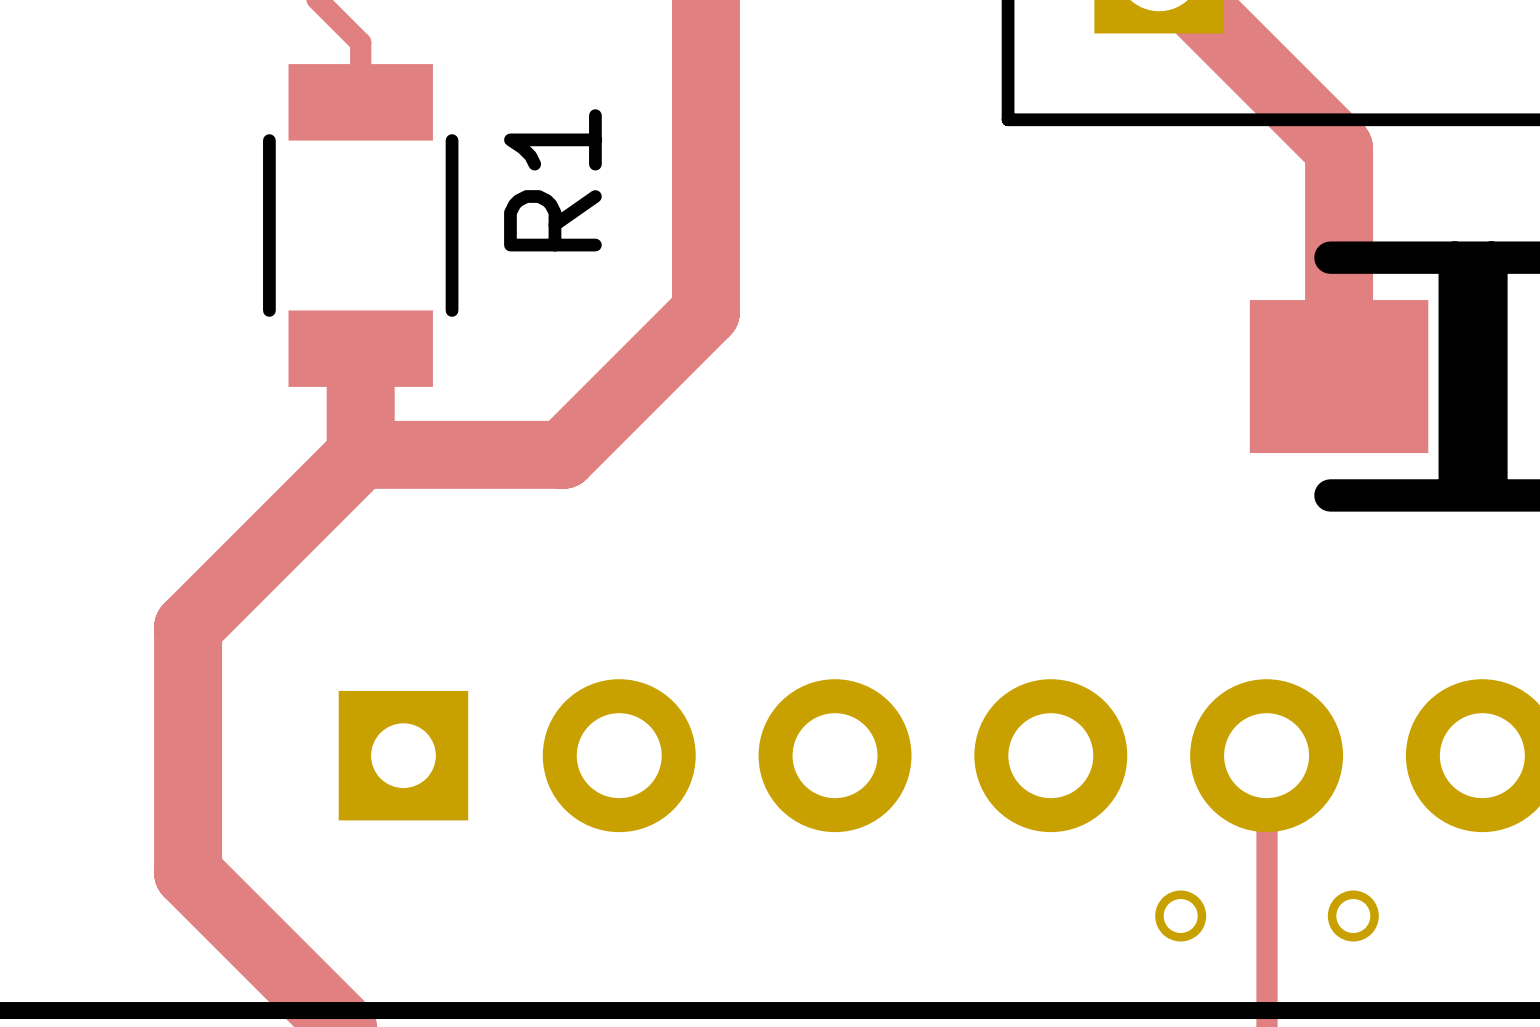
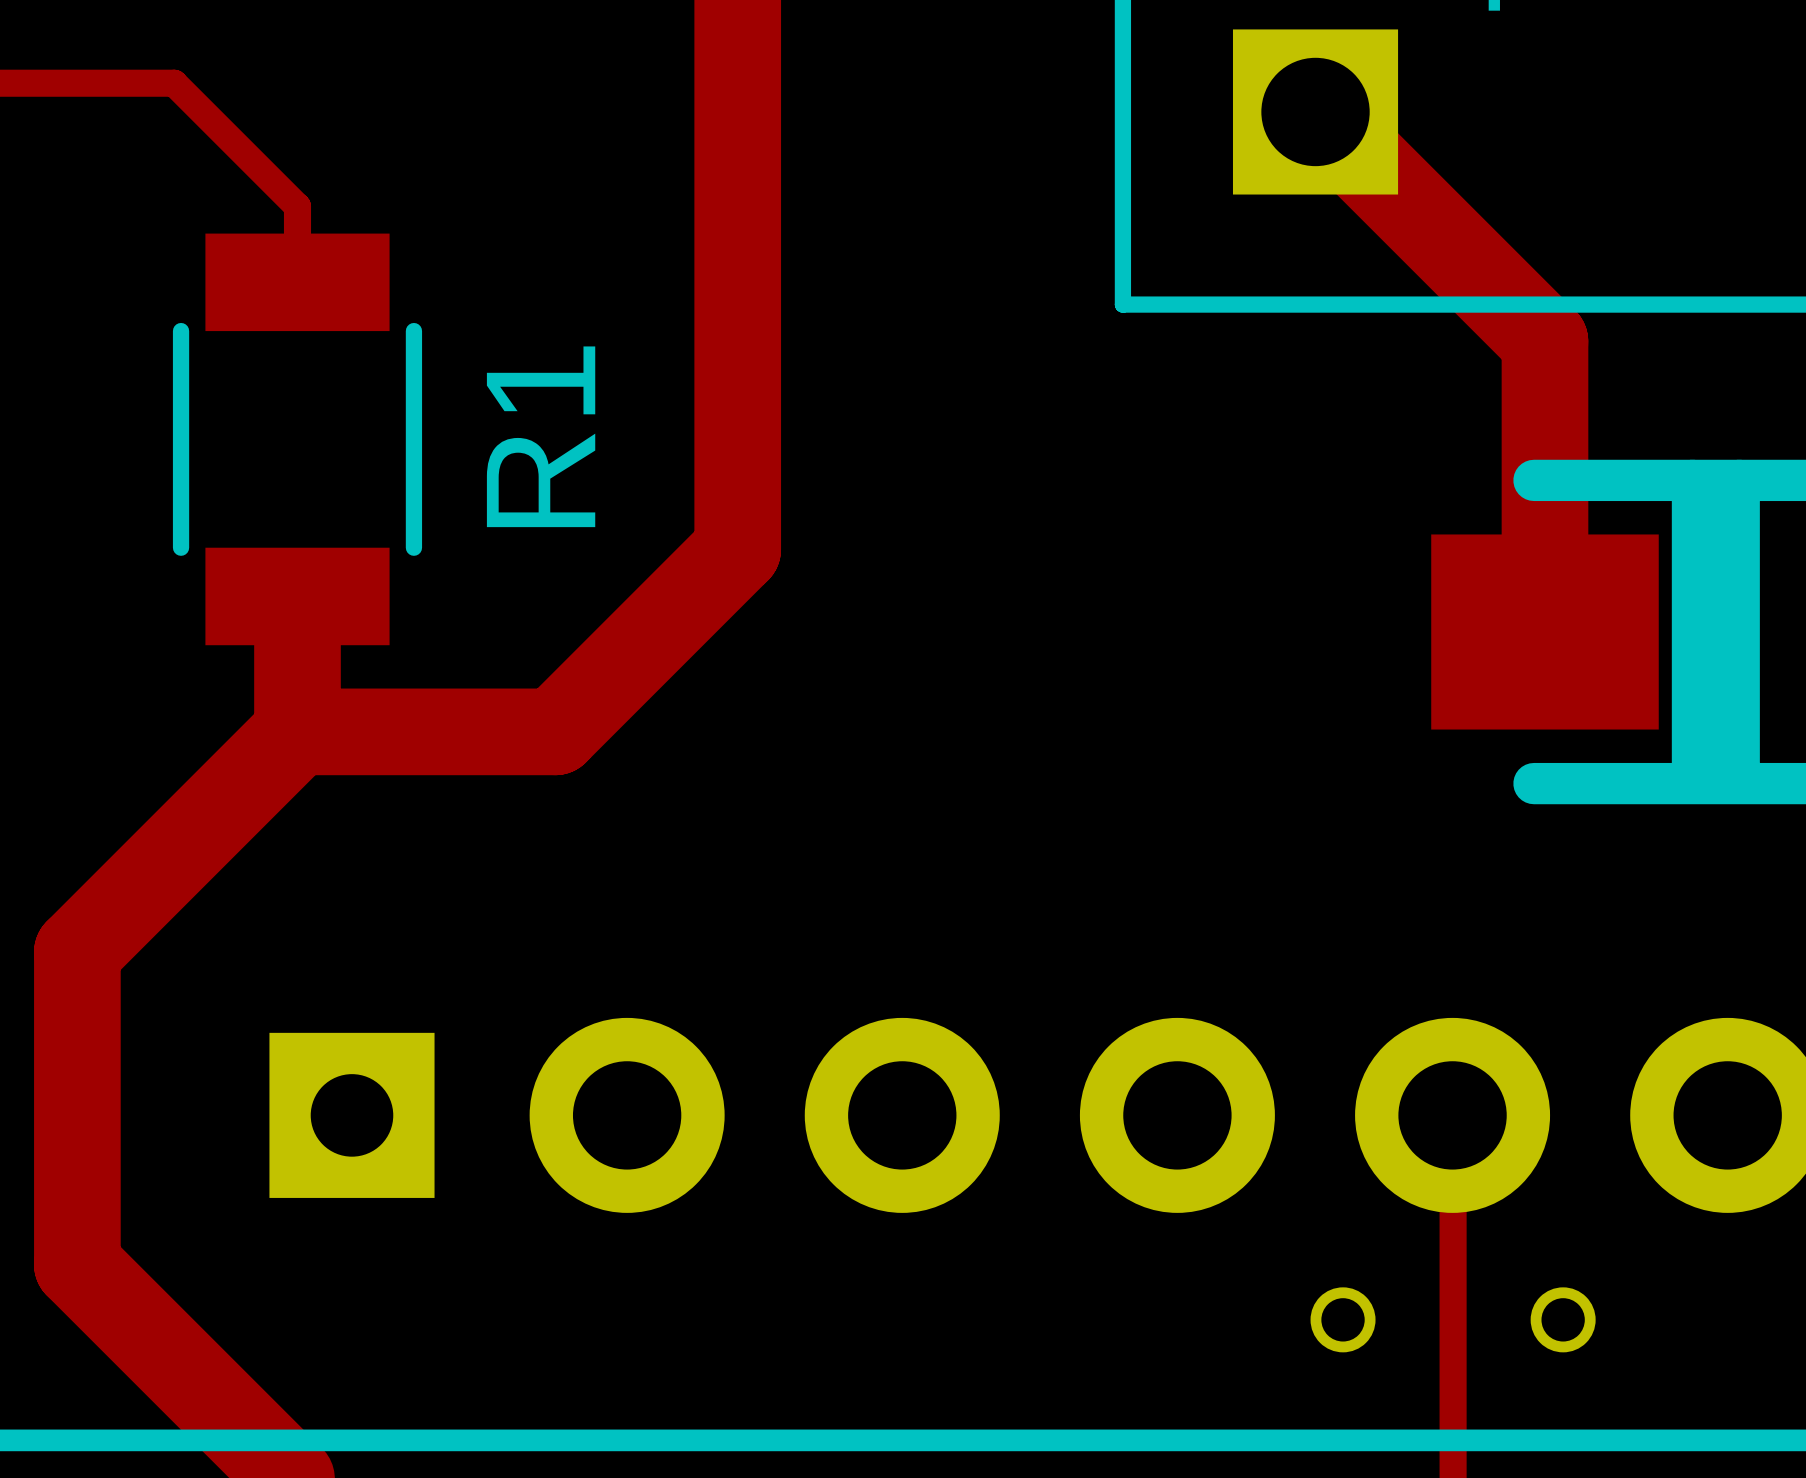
R1 name position: R1 (552, 180) -> R1 (541, 436)

